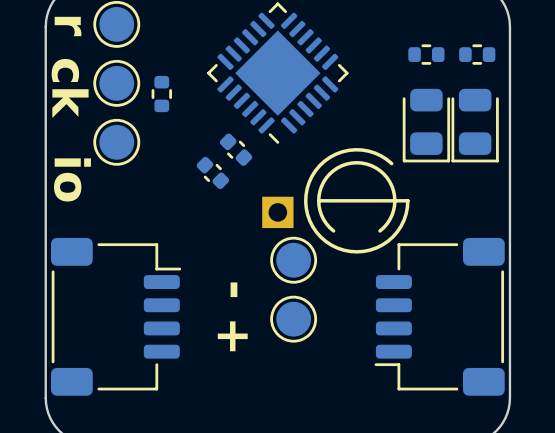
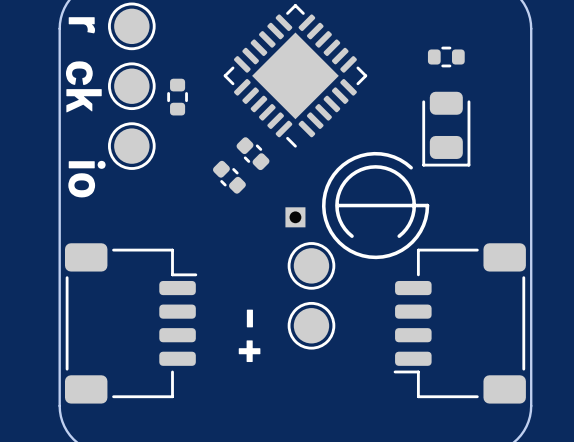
part: (477, 54) -> none
part: (475, 125) -> none
part footprint: [262, 196, 294, 229] -> [285, 207, 306, 228]

